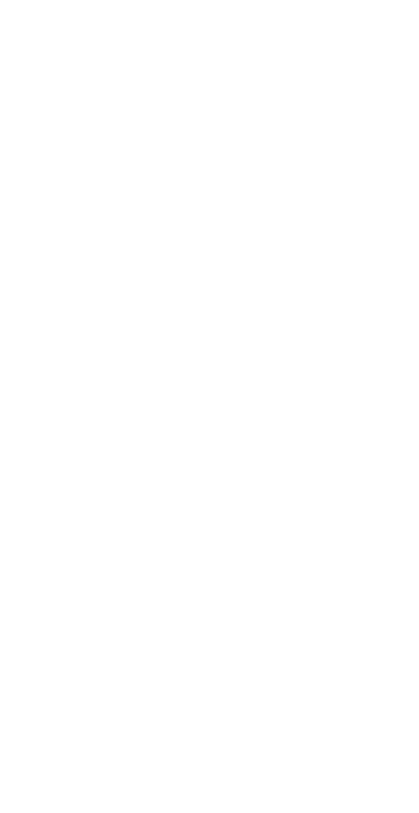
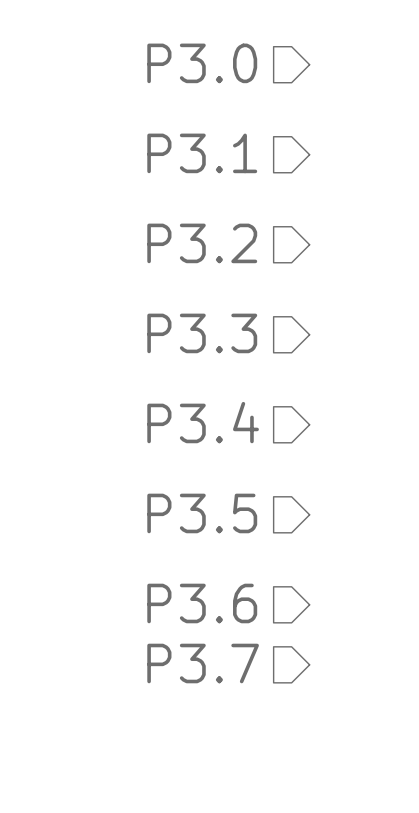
hierarchical label: none -> P3.0 (202, 63)
hierarchical label: none -> P3.1 (202, 153)
hierarchical label: none -> P3.2 (202, 243)
hierarchical label: none -> P3.3 (202, 333)
hierarchical label: none -> P3.4 (203, 422)
hierarchical label: none -> P3.5 (202, 513)
hierarchical label: none -> P3.6 (202, 603)
hierarchical label: none -> P3.7 (203, 663)

